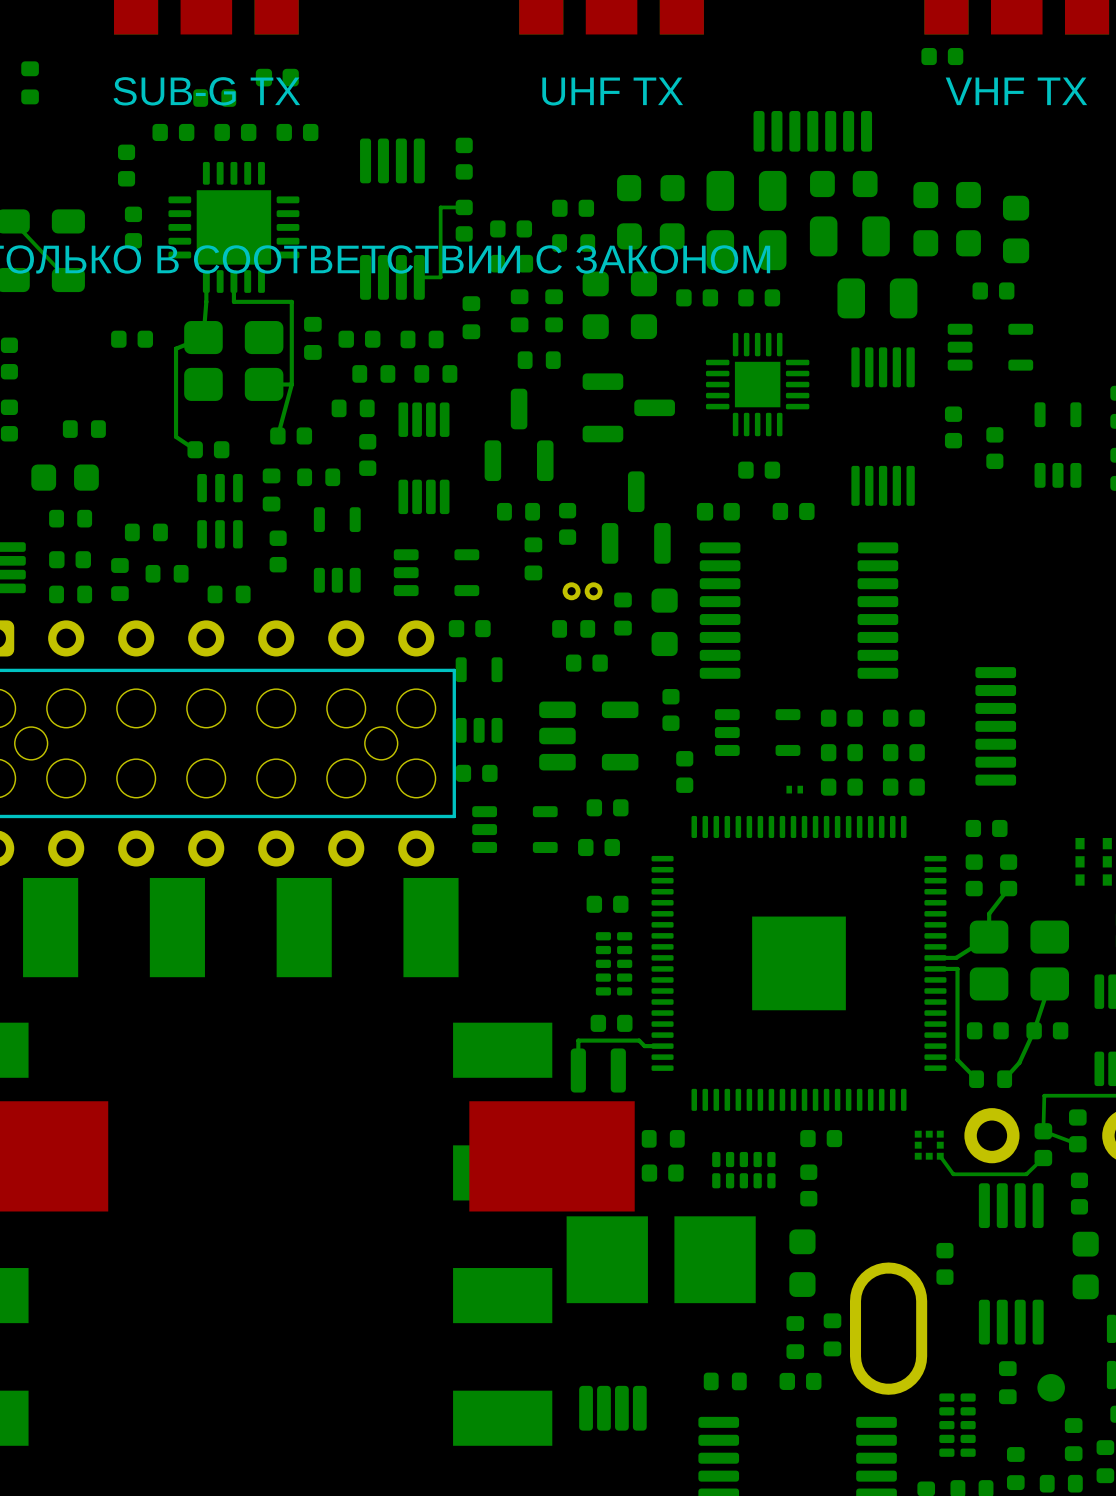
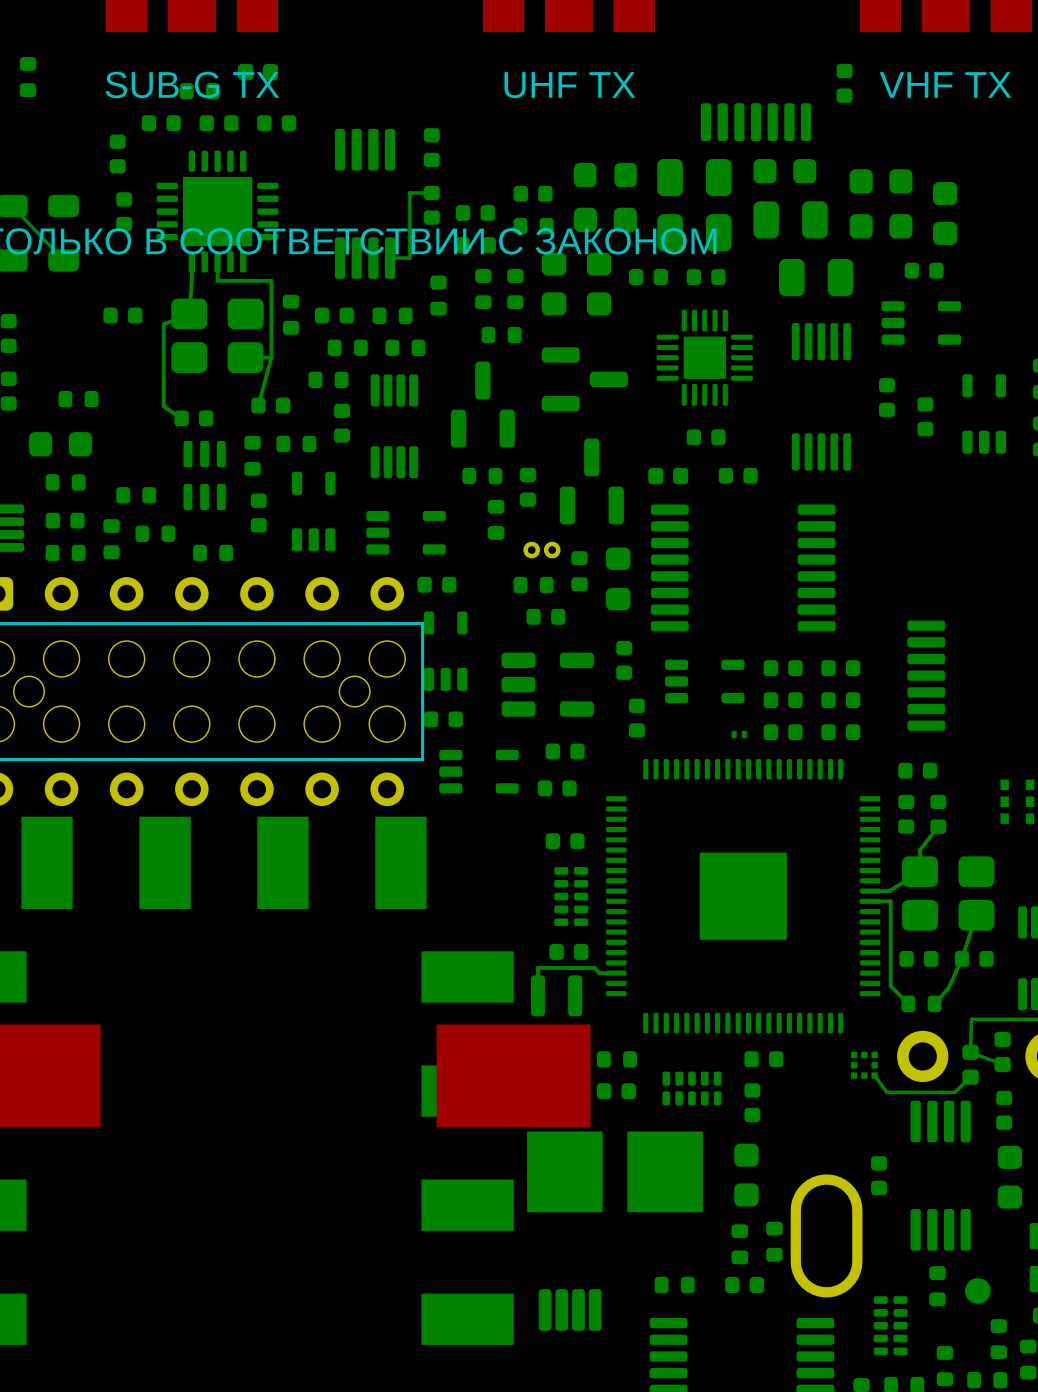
part rotation: 0° (942, 56) -> 90° clockwise (844, 83)
part position: (942, 56) -> (844, 83)

